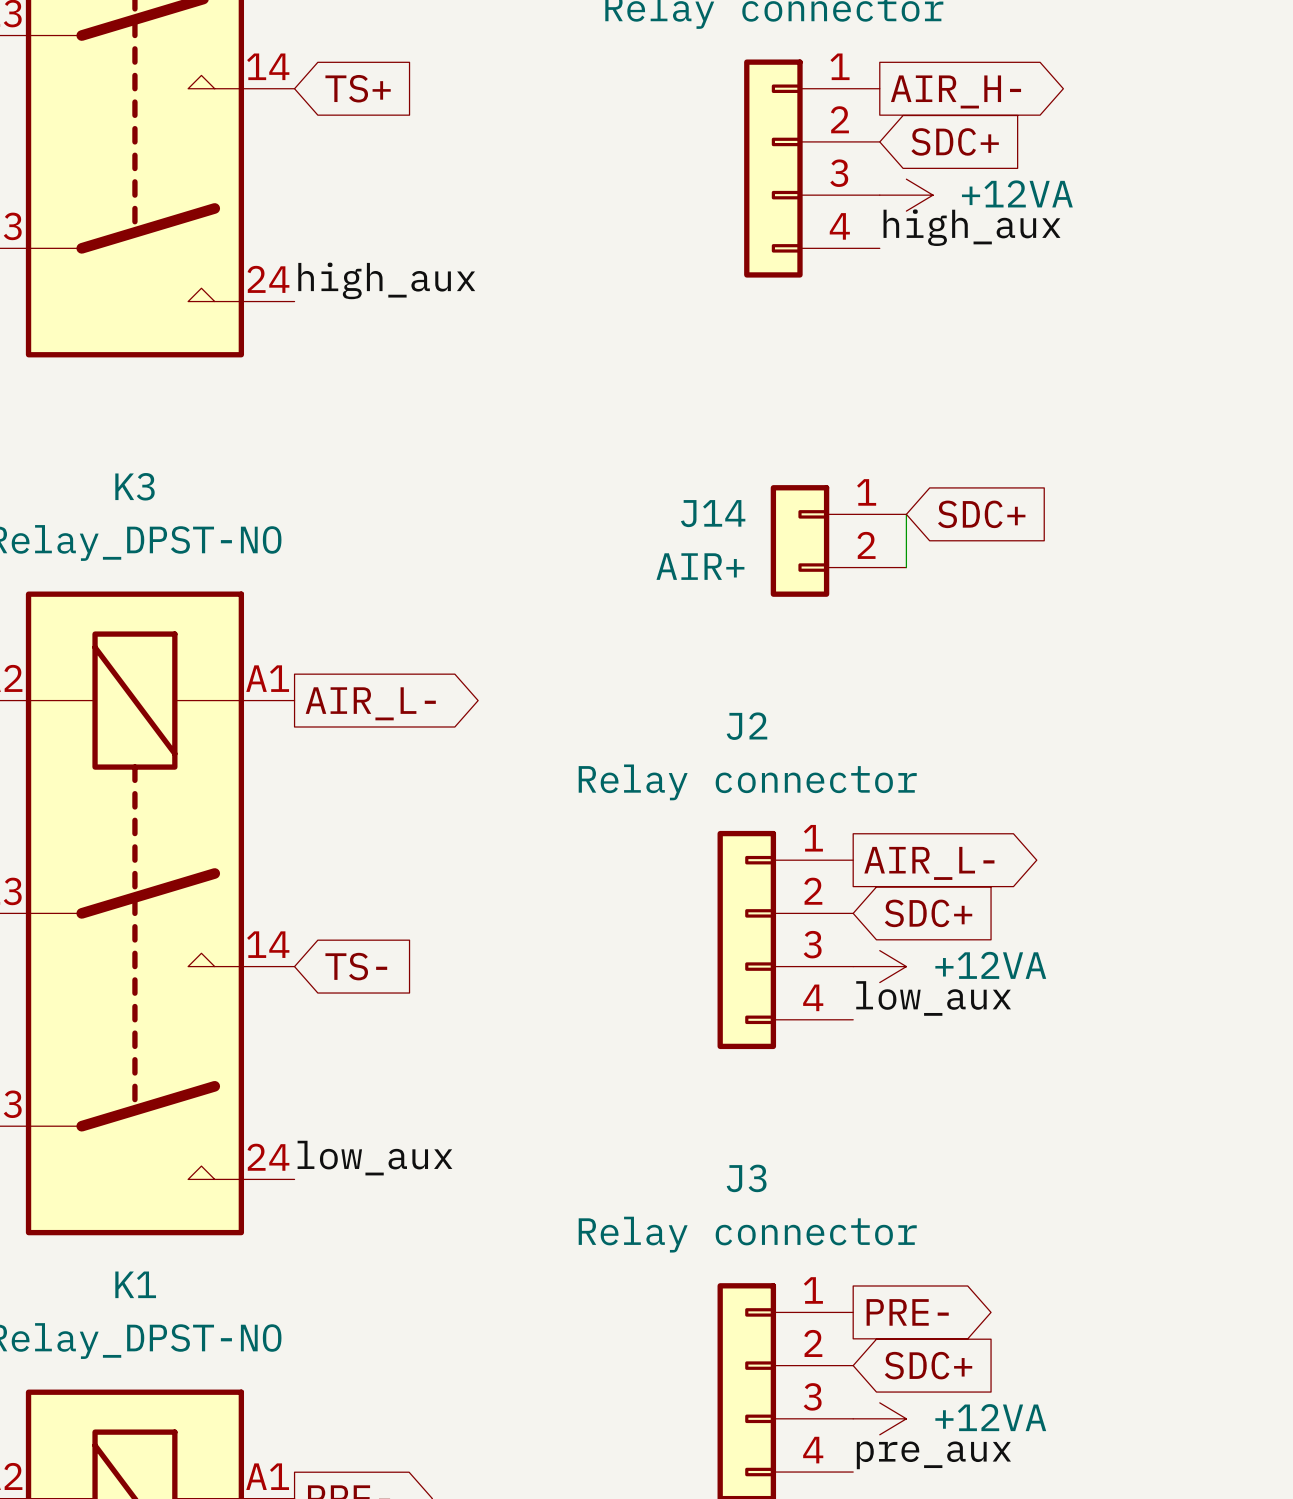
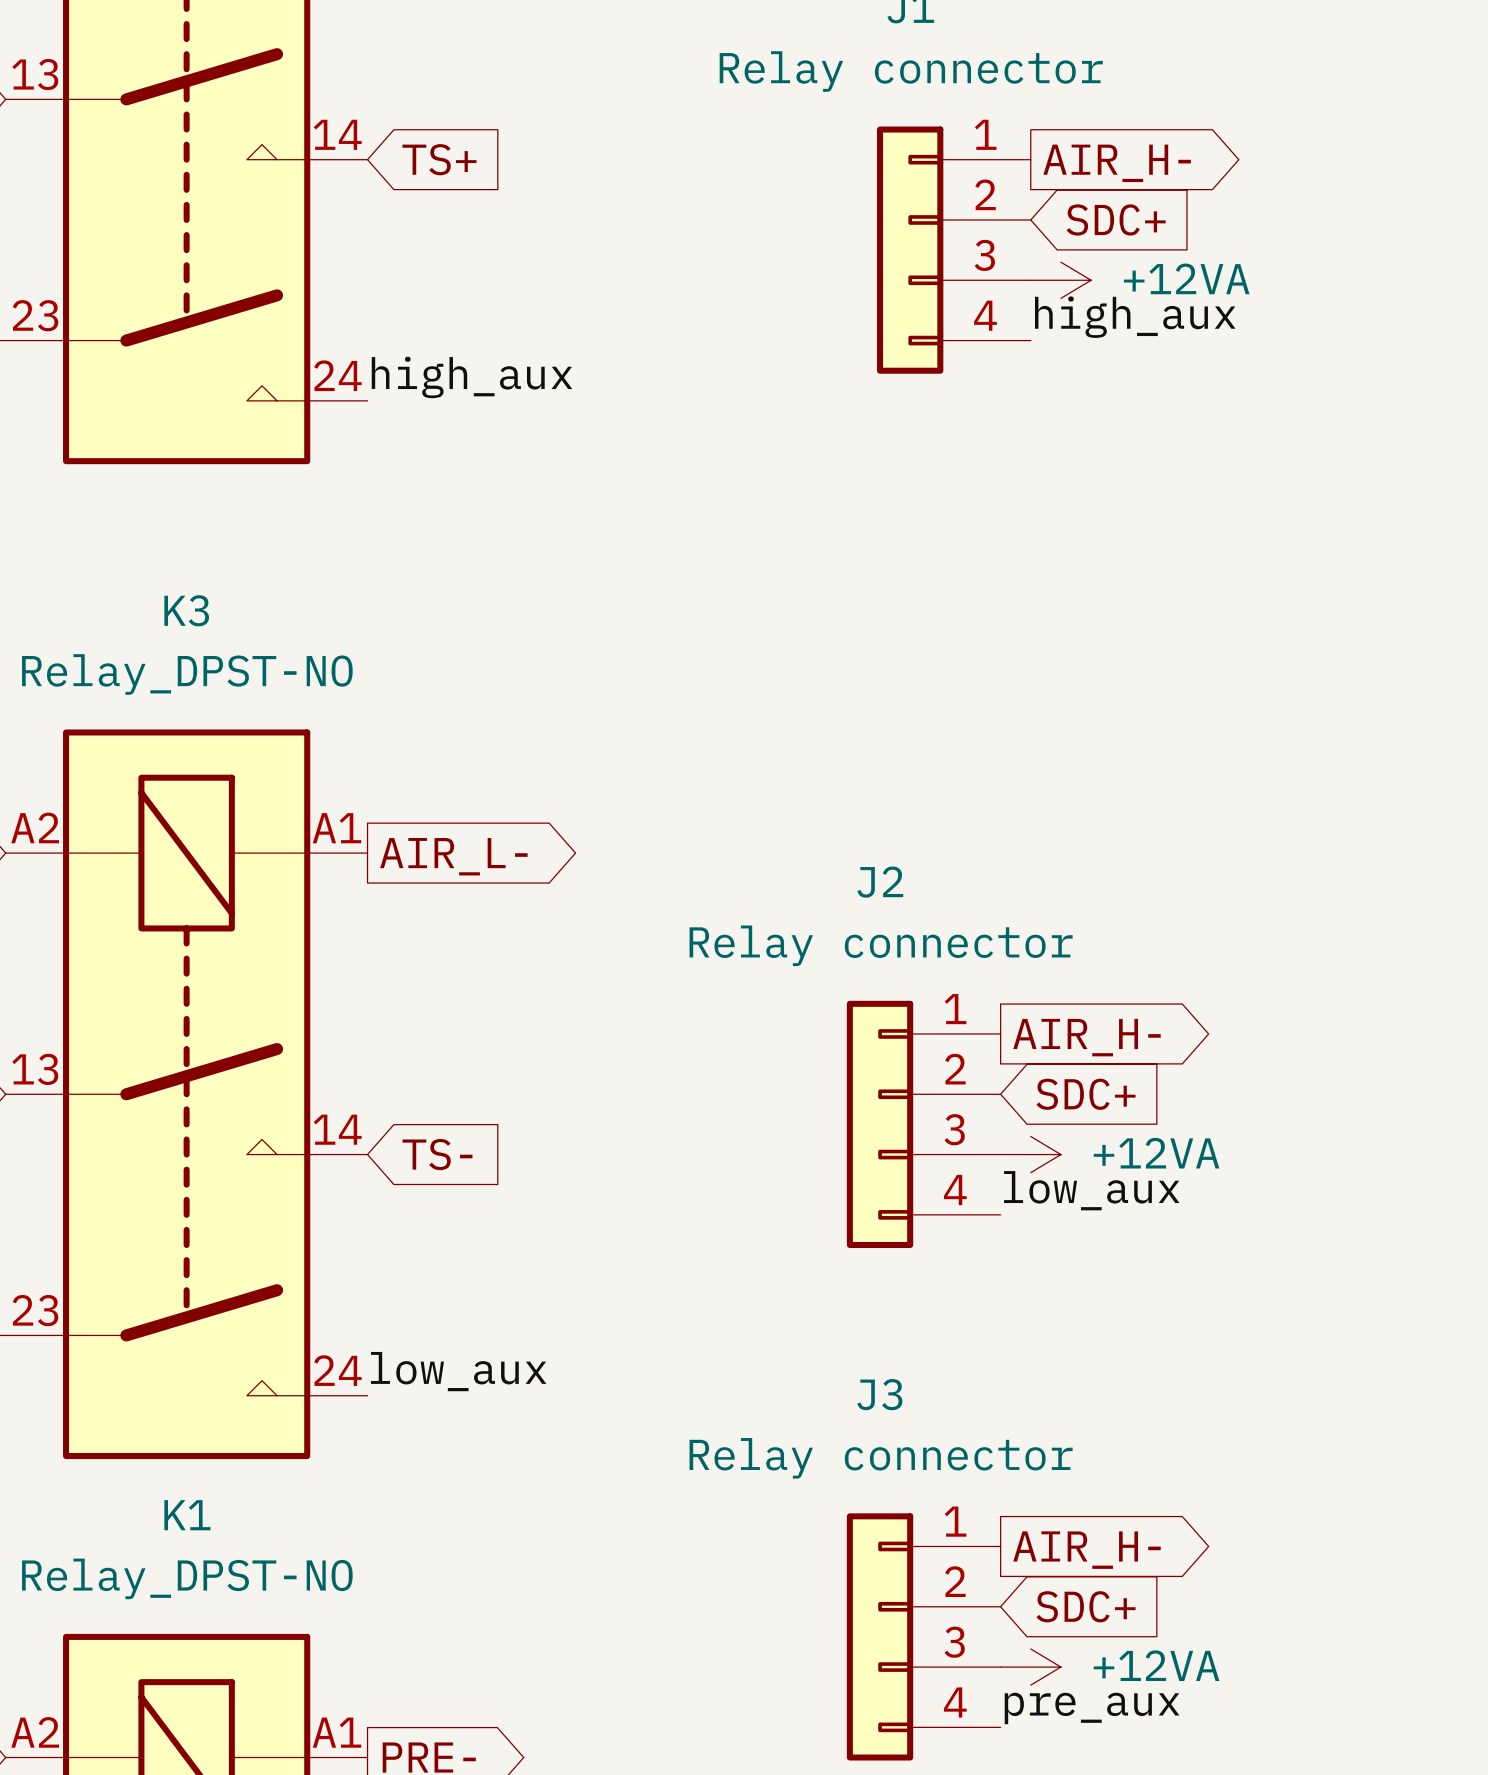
wire: (906, 514) (906, 567) -> none
global label: SDC+ (981, 514) -> none
J14: AIR+ (838, 540) -> none
global label: AIR_L- (929, 863) -> AIR_H- (1086, 1037)
global label: PRE- (907, 1312) -> AIR_H- (1086, 1550)

